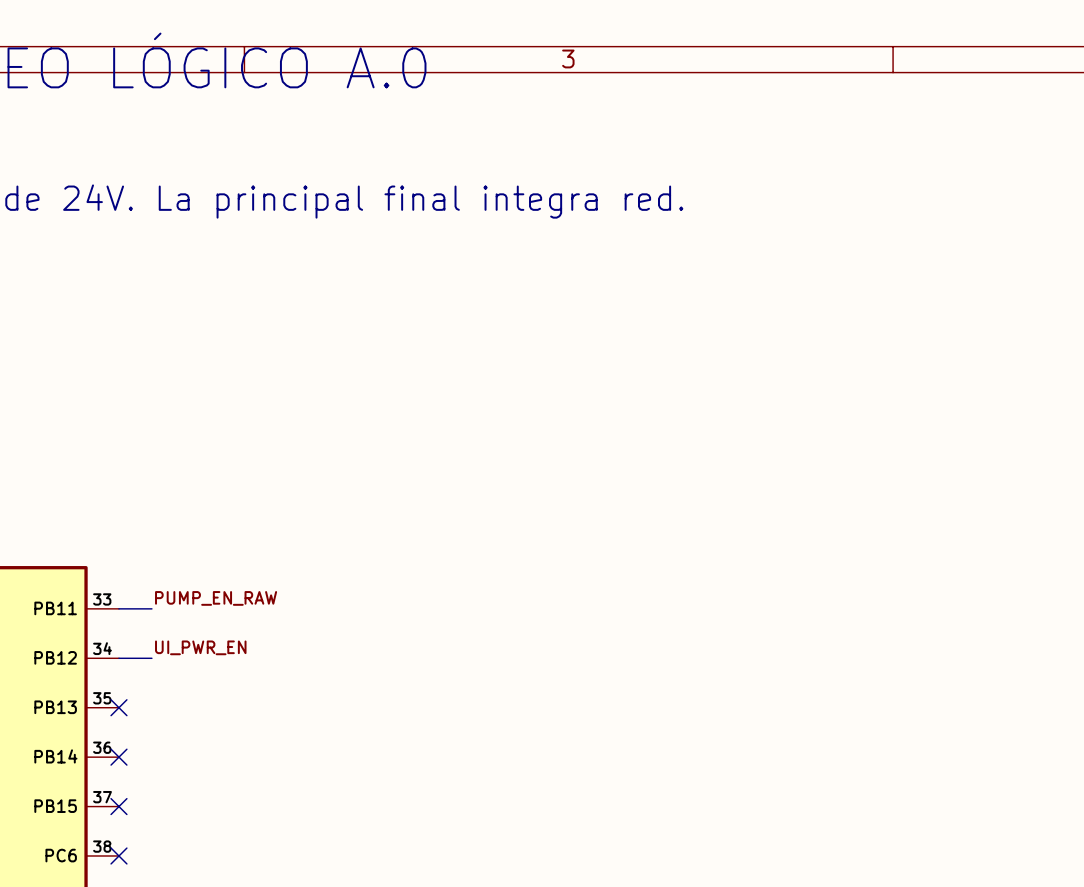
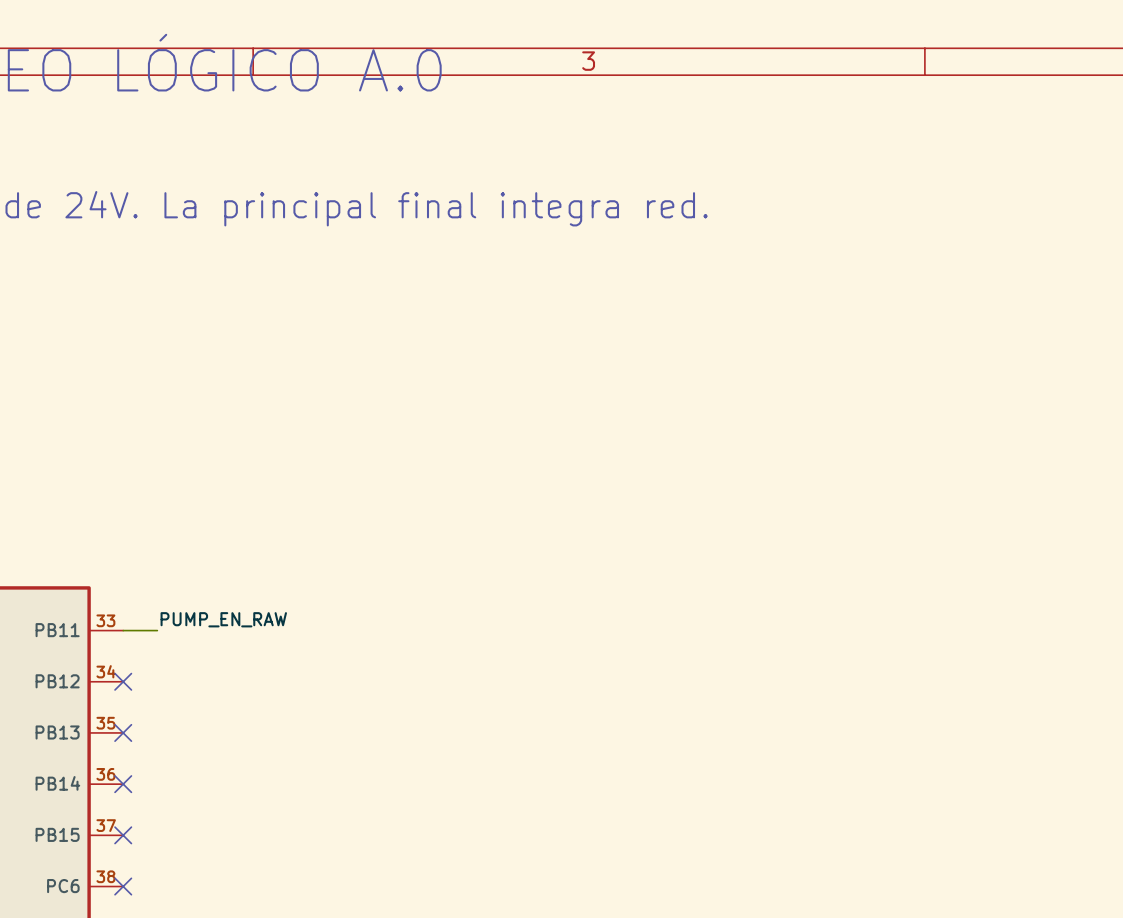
label: UI_PWR_EN (200, 647) -> none
wire: (118, 658) (151, 658) -> none
no-connect mark: none -> (123, 681)

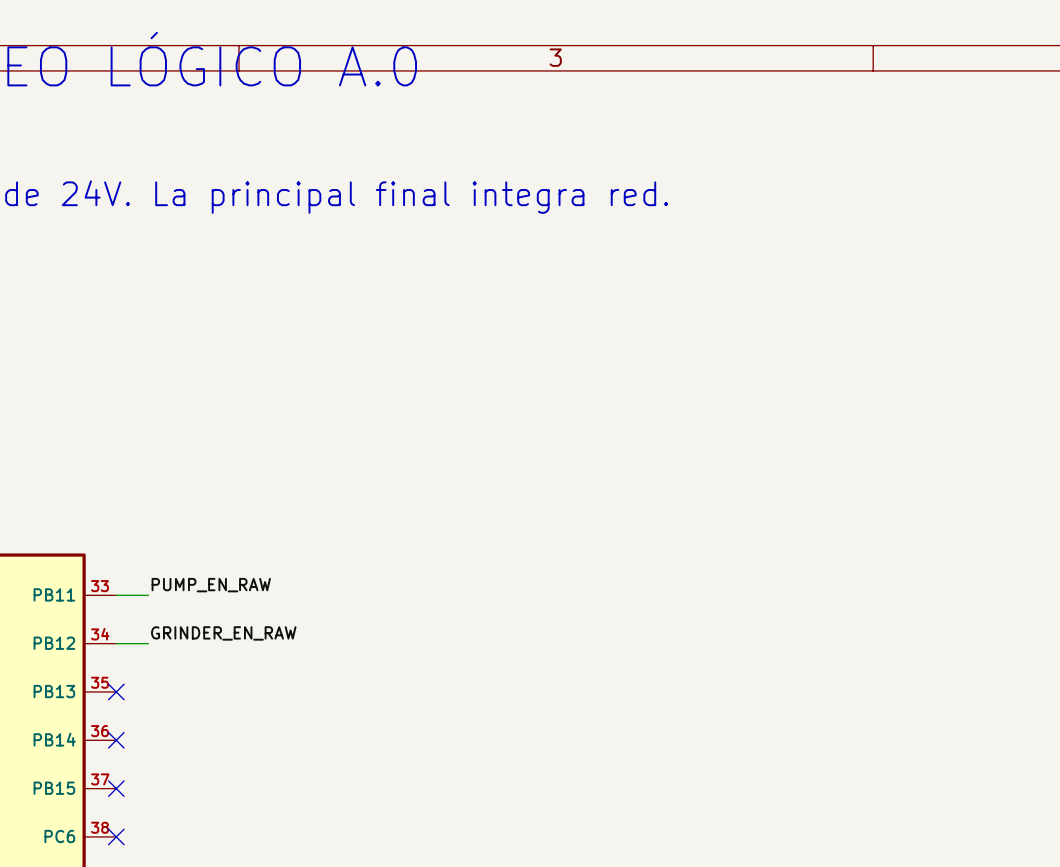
label: none -> GRINDER_EN_RAW (223, 633)
wire: none -> (116, 643) (148, 643)
no-connect mark: (123, 681) -> none

